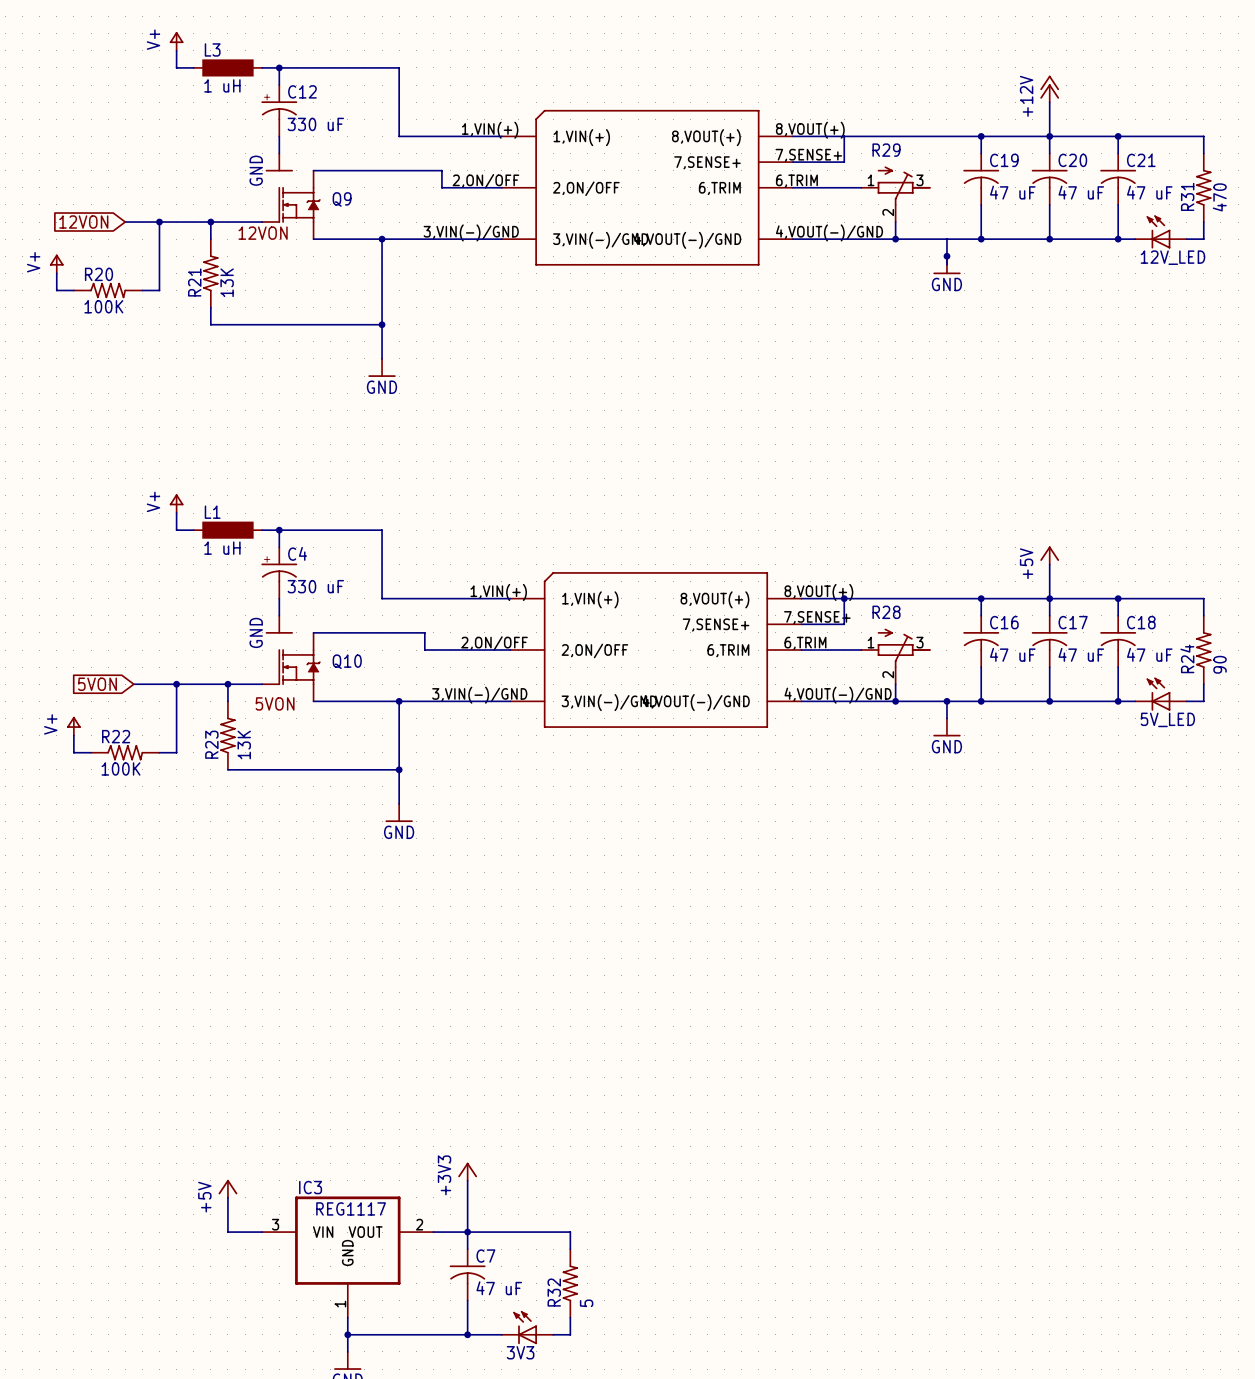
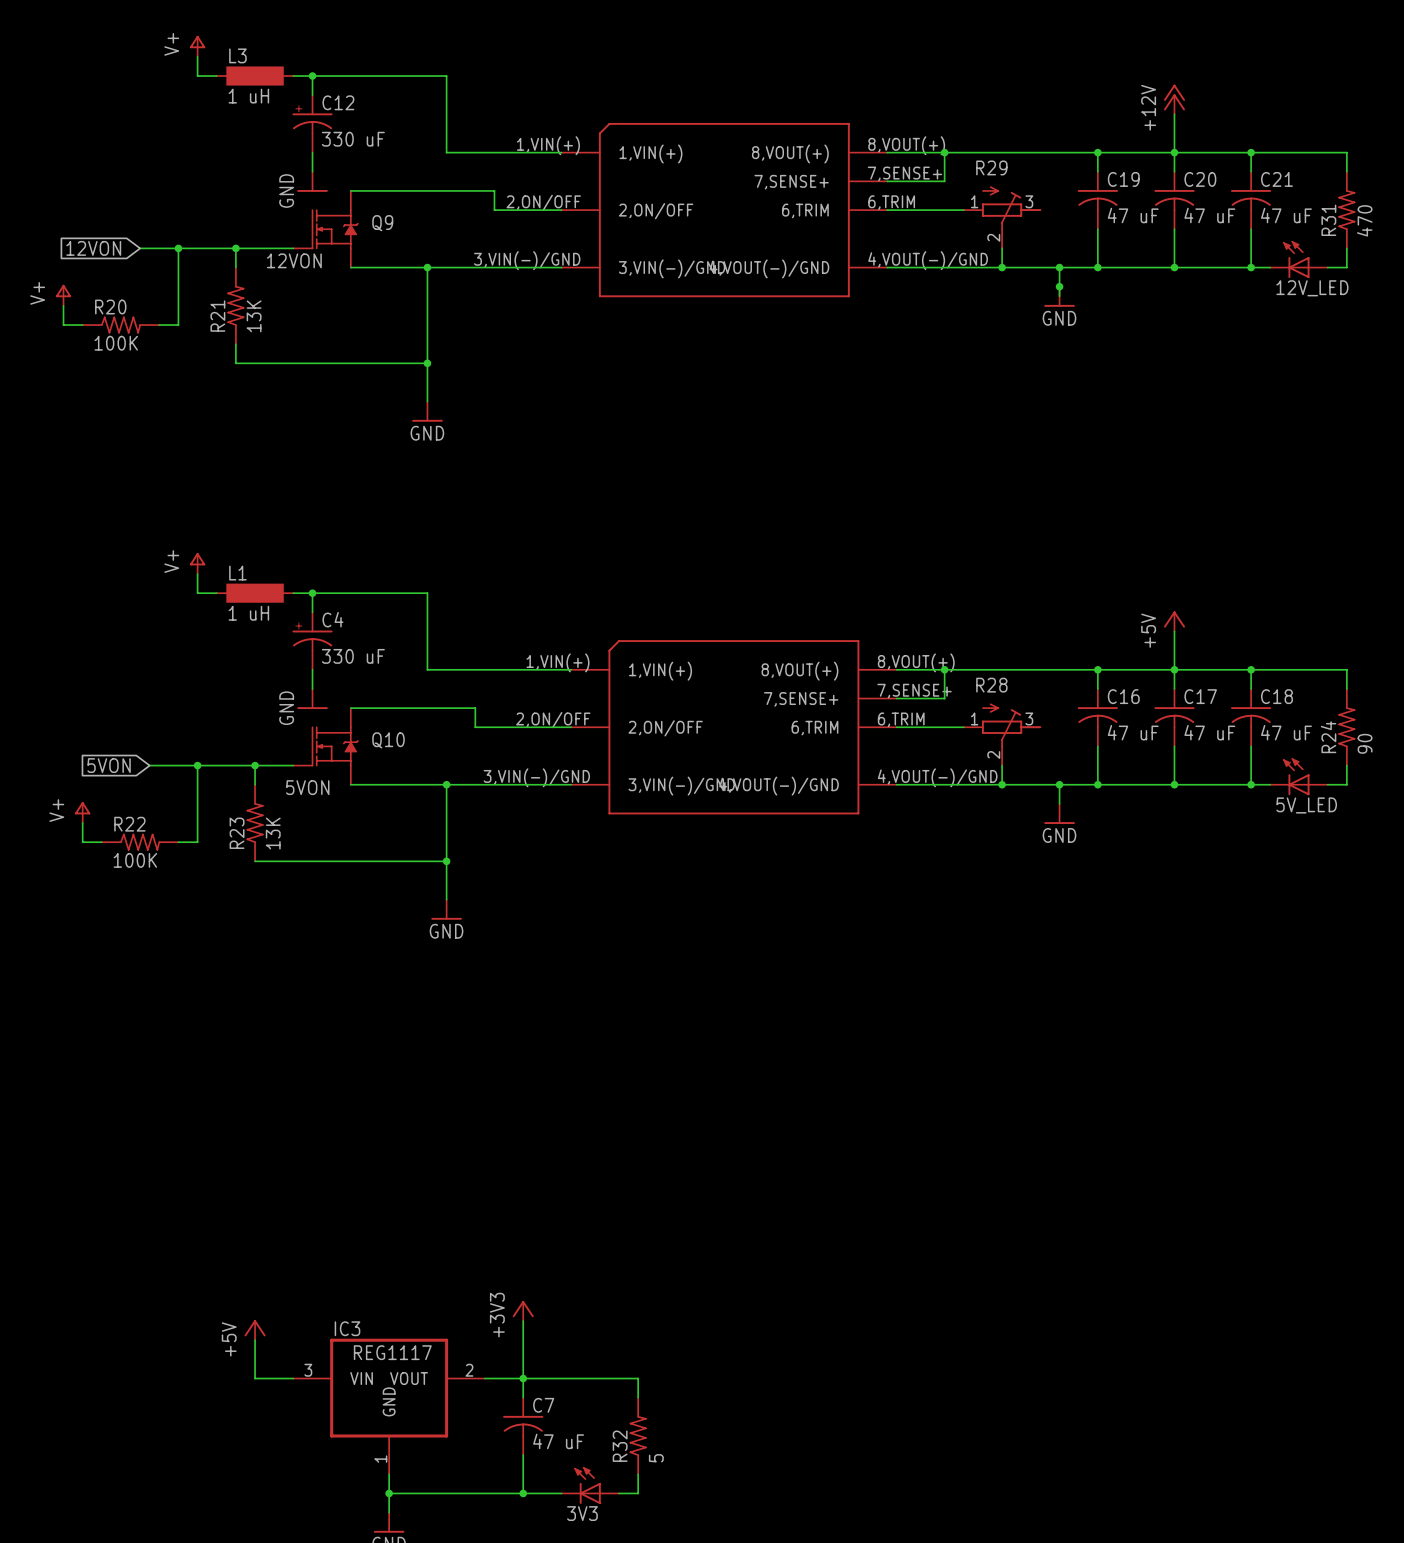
junction: none -> (944, 152)
junction: none -> (1059, 267)

